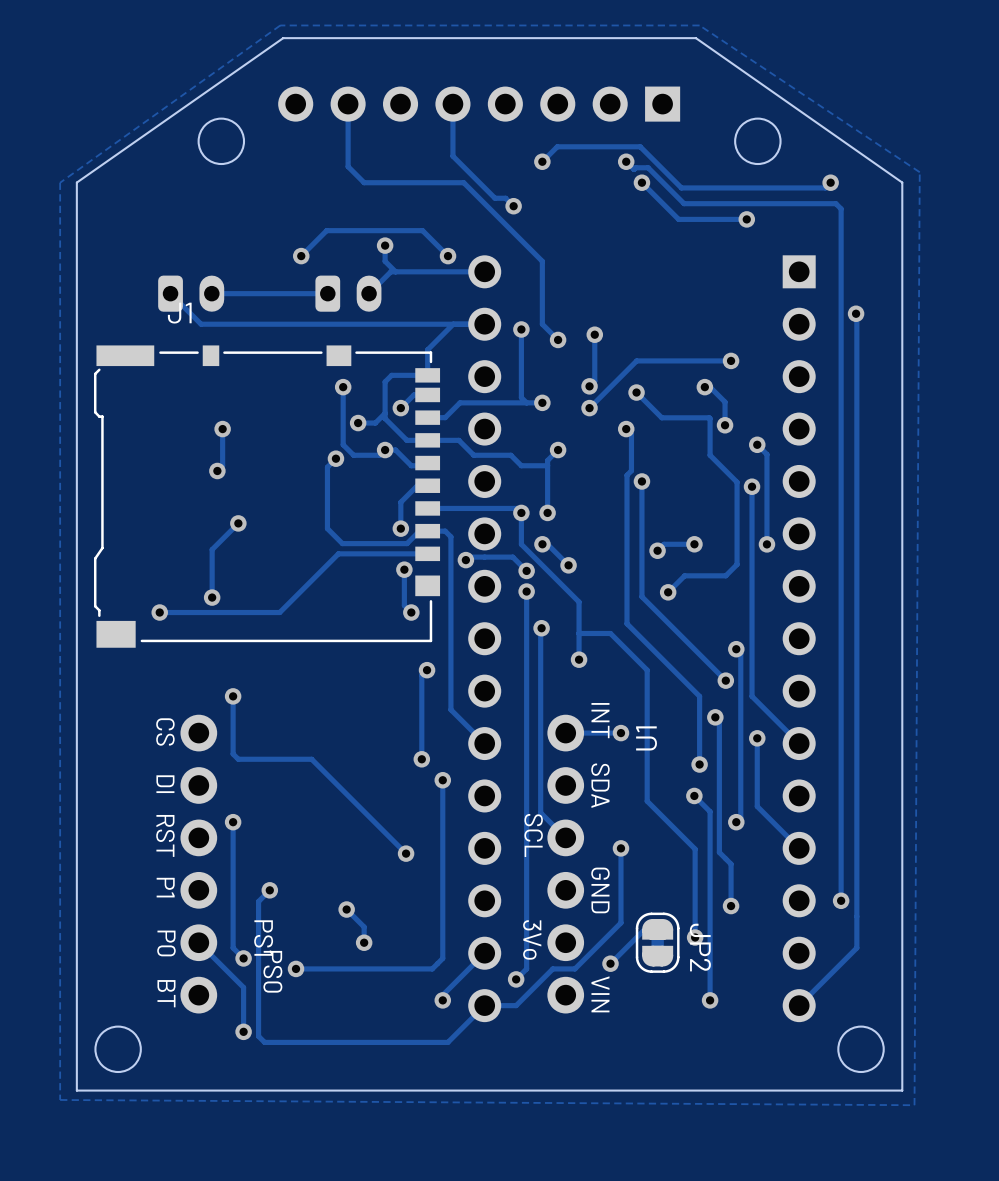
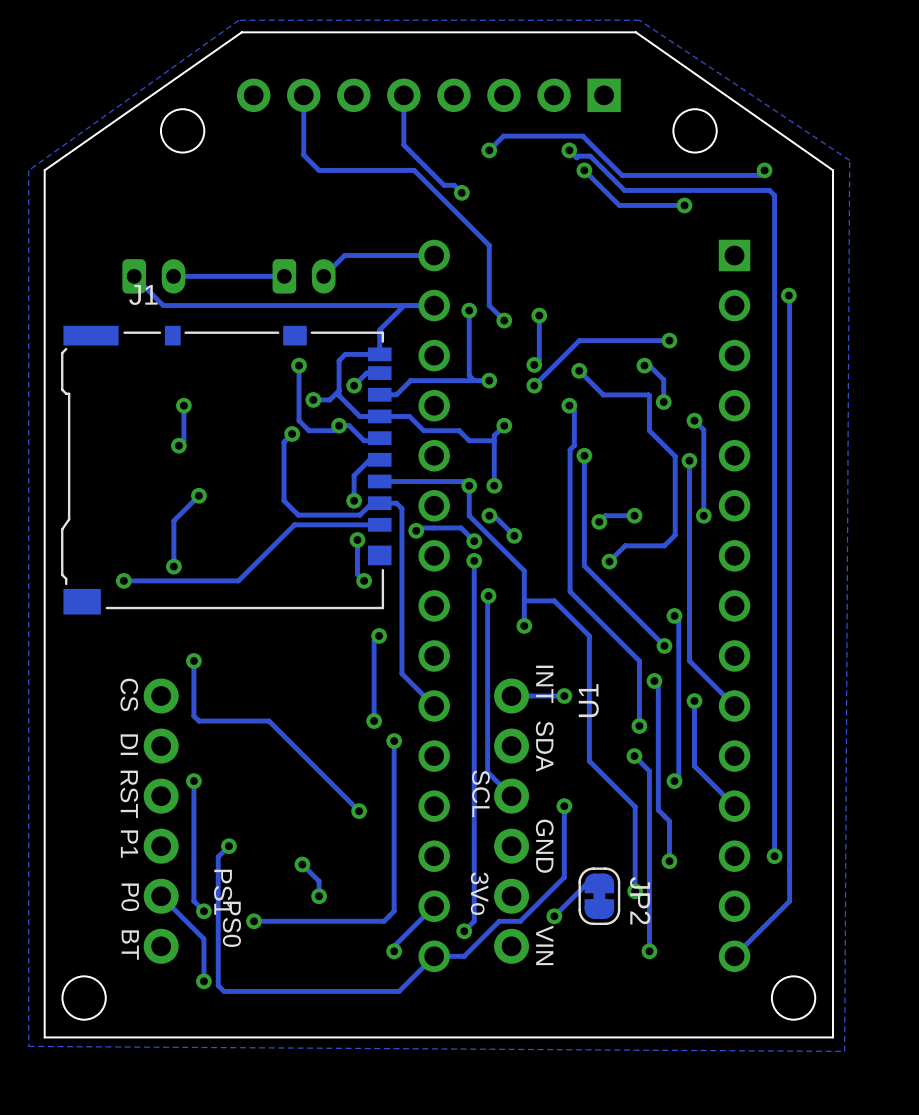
track: (385, 245) (385, 261) (395, 271) -> none
via: (385, 245) -> none
via: (301, 256) -> none
track: (448, 256) (422, 230) (326, 230) (301, 256) -> none
via: (448, 256) -> none

